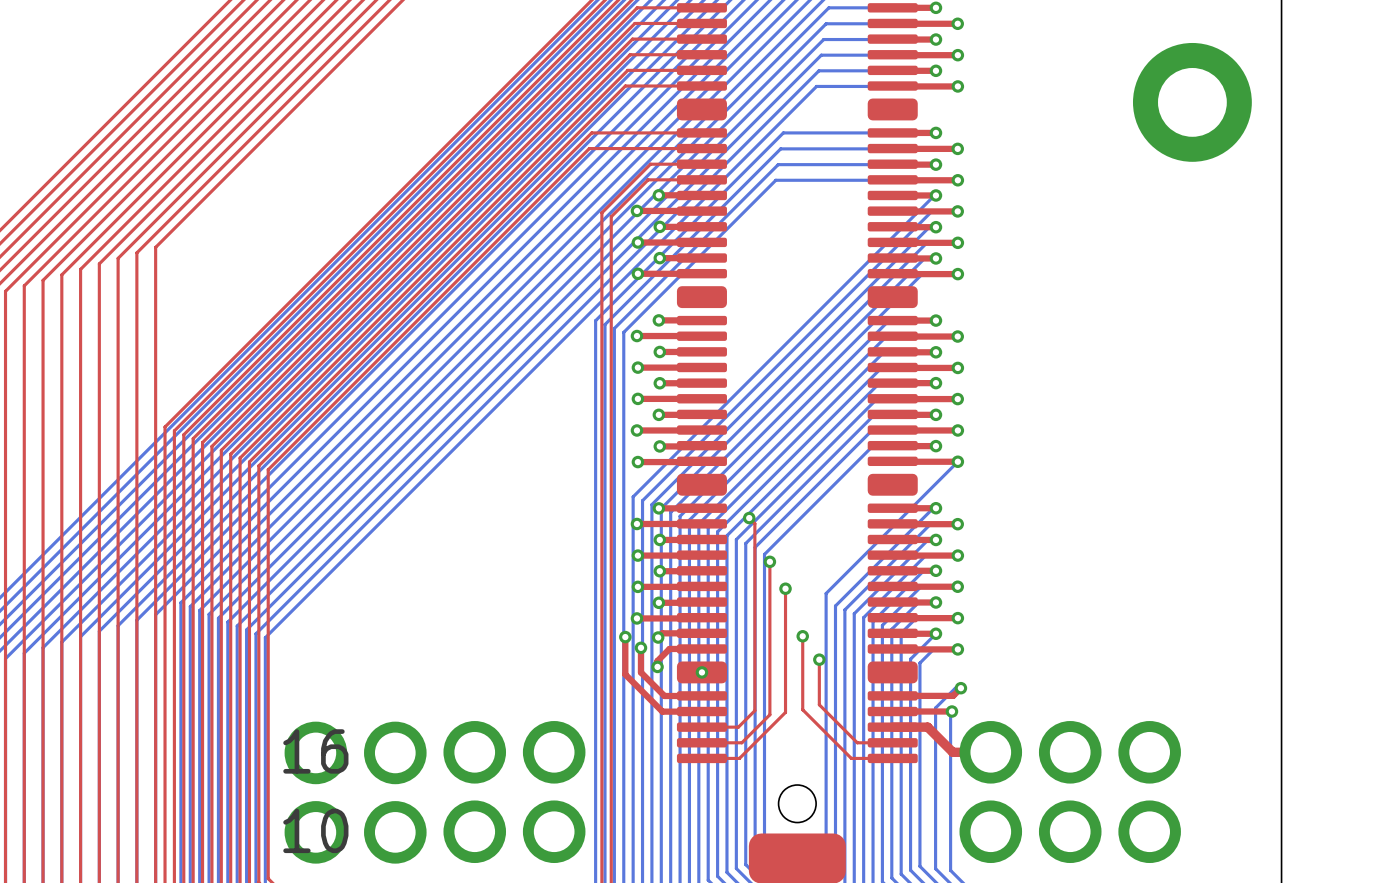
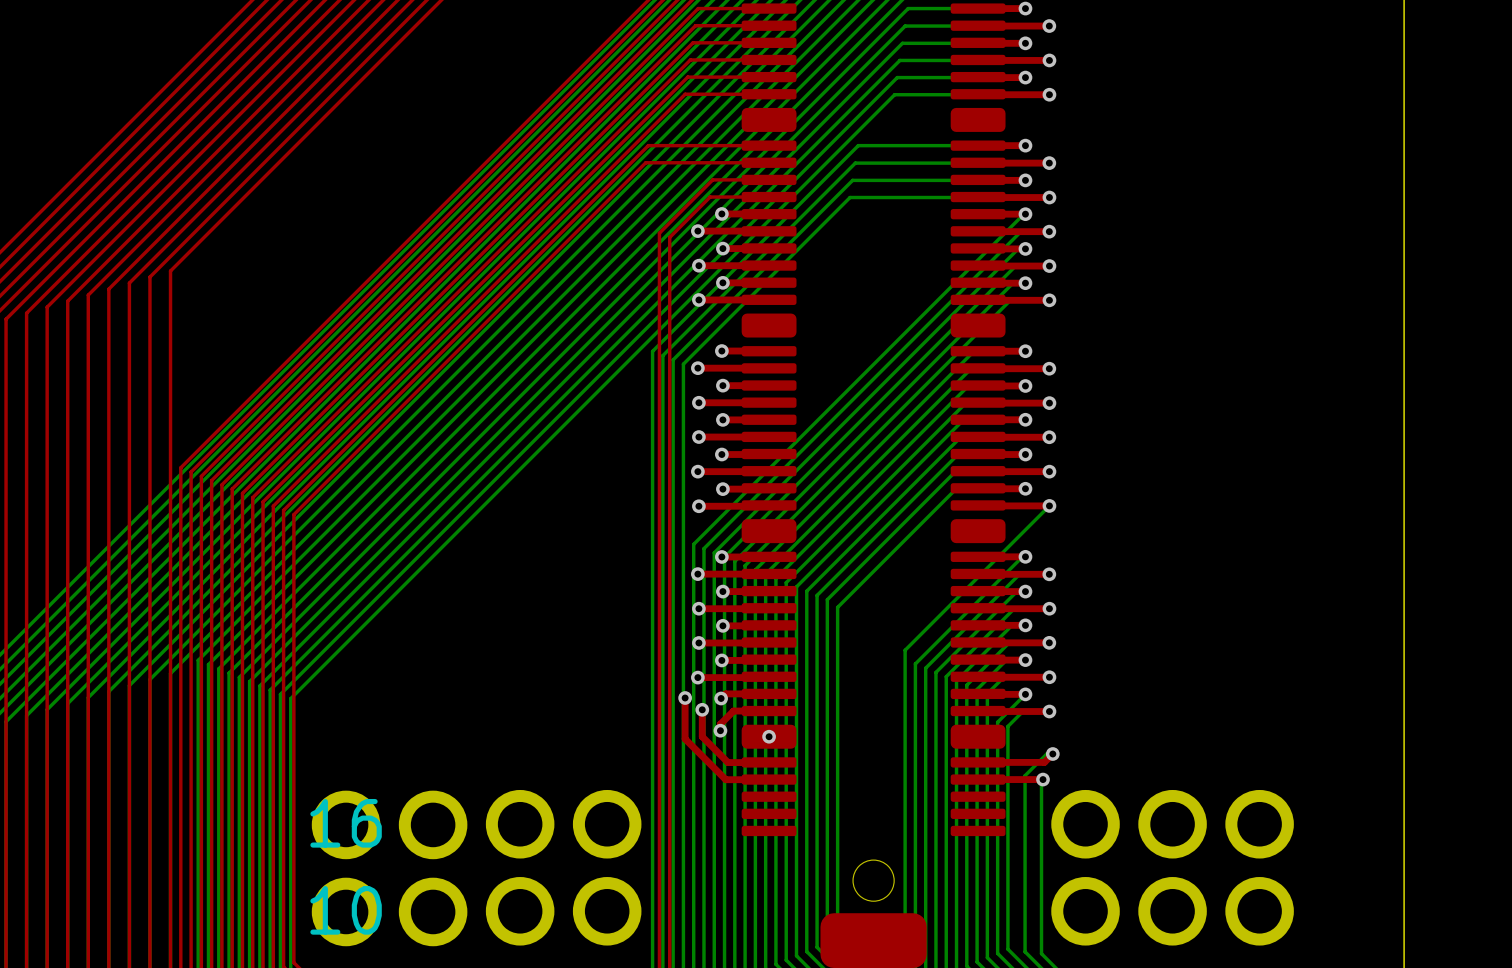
part: (1192, 102) -> none
top track: (749, 518) (754, 523) (754, 710) (738, 727) (701, 727) -> none
via: (749, 518) -> none
top track: (769, 561) (769, 714) (741, 742) (701, 742) -> none
via: (769, 561) -> none
top track: (785, 588) (785, 712) (739, 758) (701, 758) -> none
via: (785, 588) -> none
top track: (802, 636) (802, 709) (851, 758) (892, 758) -> none
via: (802, 636) -> none
top track: (819, 659) (819, 704) (857, 742) (892, 742) -> none
via: (819, 659) -> none
top track: (892, 727) (927, 727) (952, 752) (990, 752) -> none

